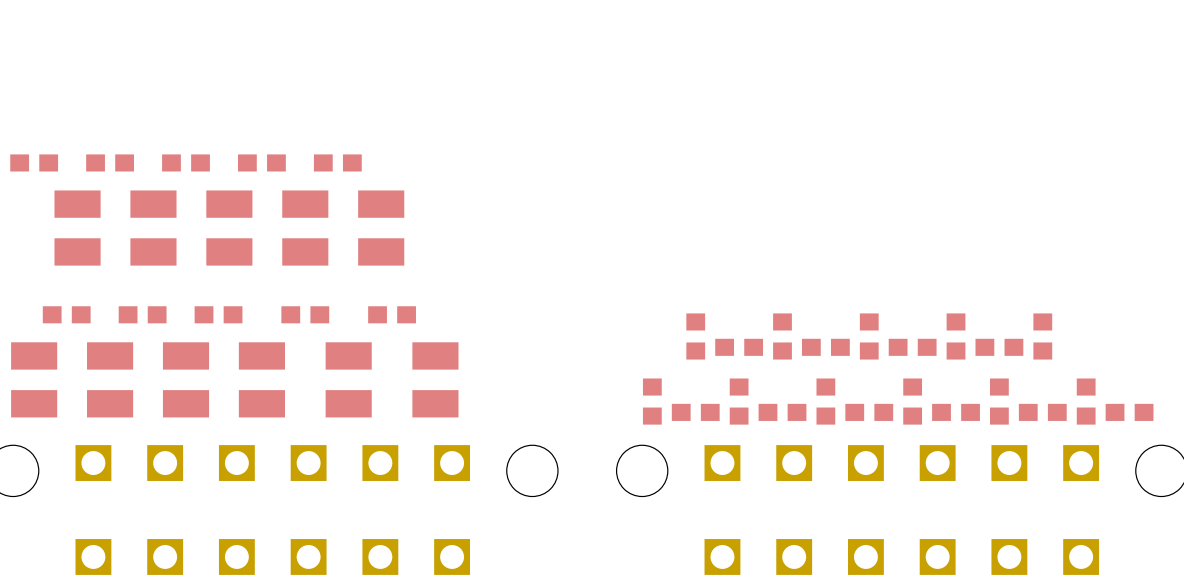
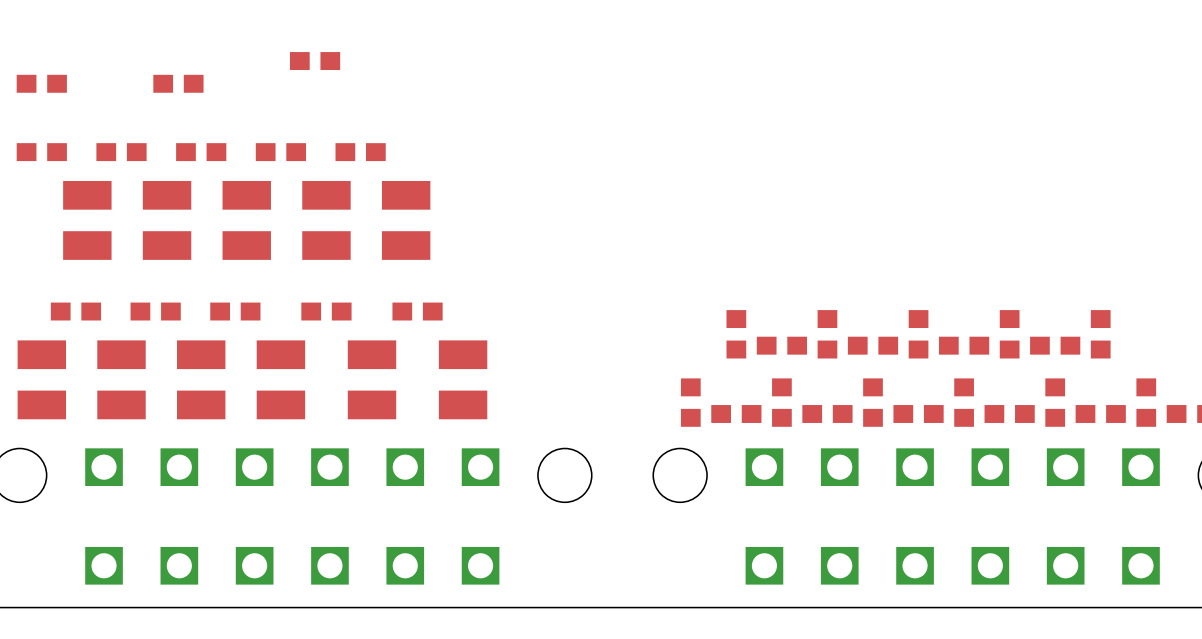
part: none -> (315, 61)
part: none -> (41, 83)
part: none -> (178, 83)

